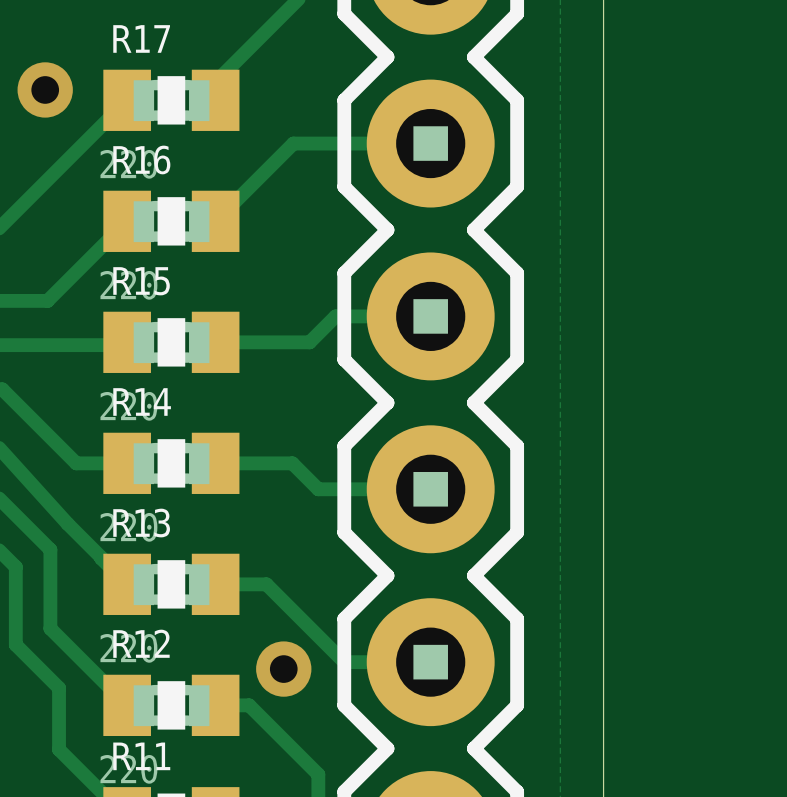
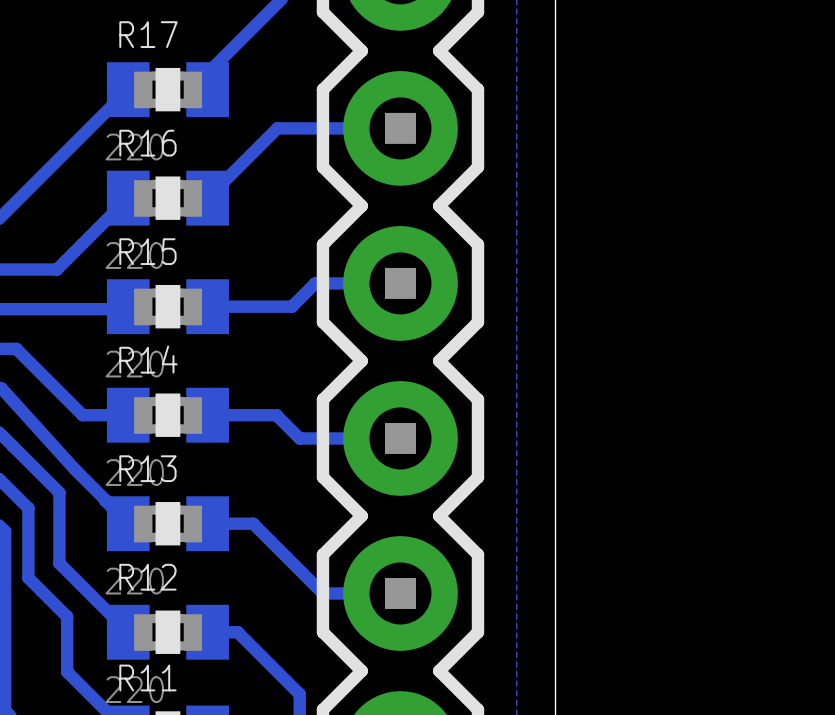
via: (45, 89) -> none
via: (283, 669) -> none

